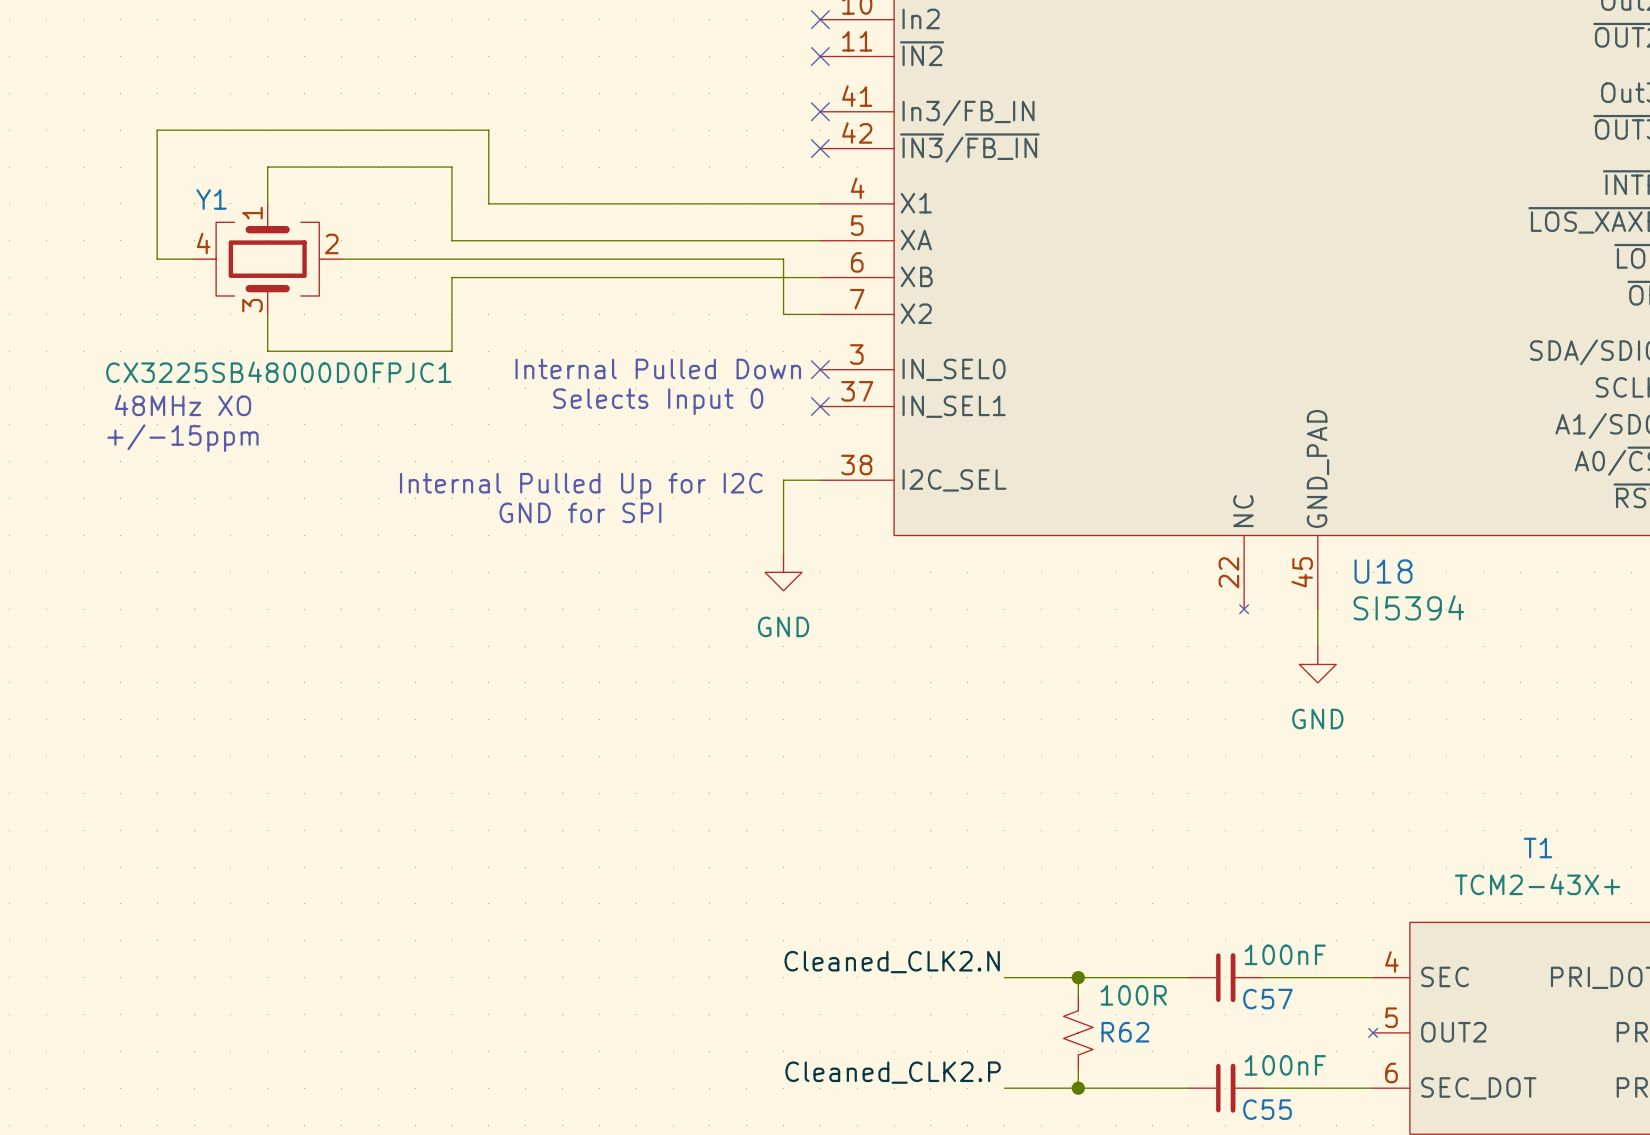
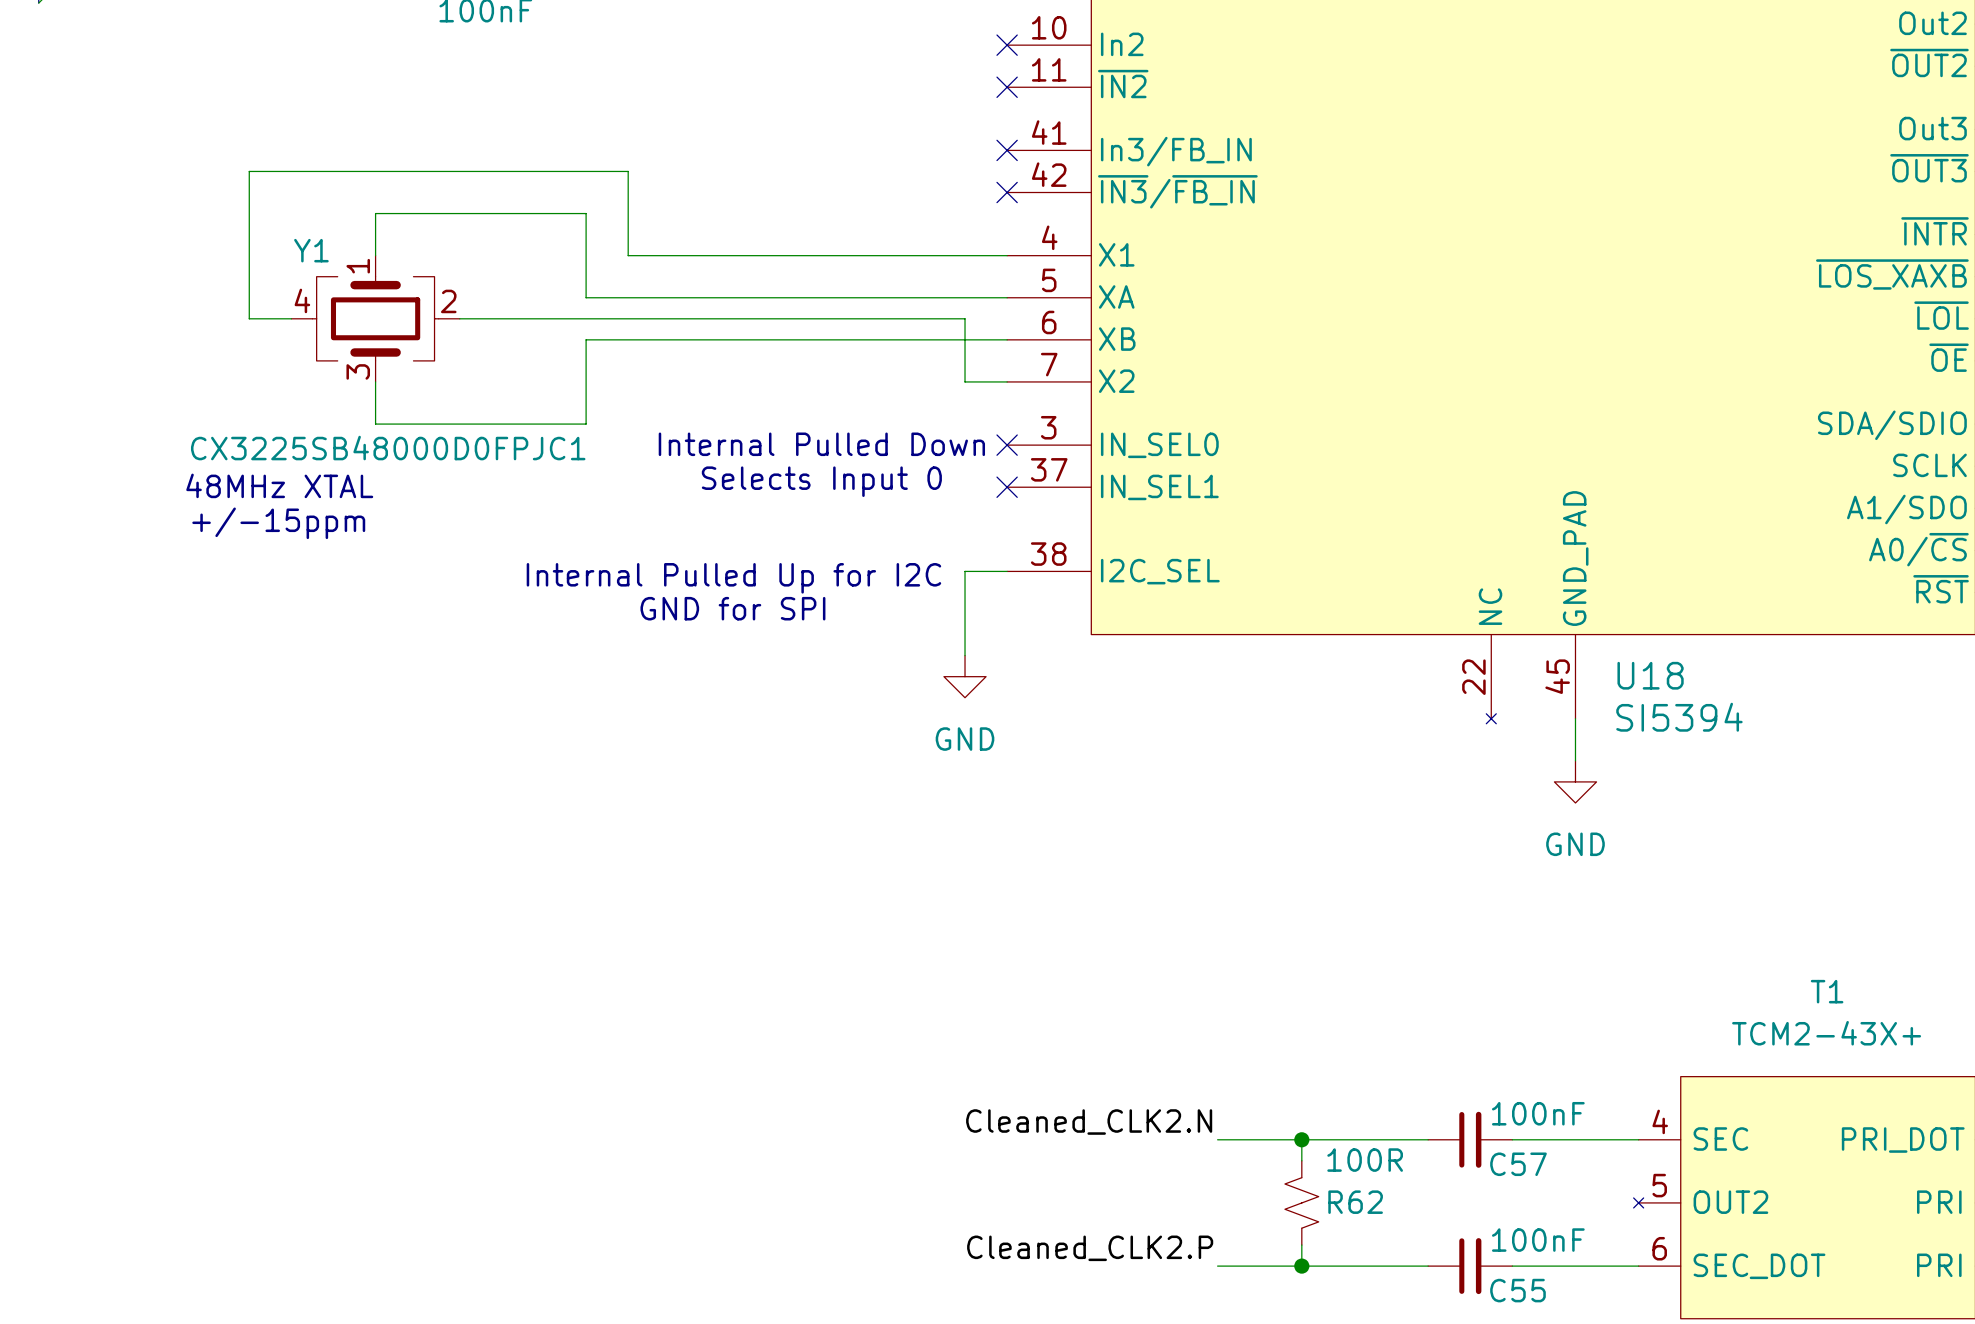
text: 48MHz XO (182, 405) -> 48MHz XTAL (279, 485)

